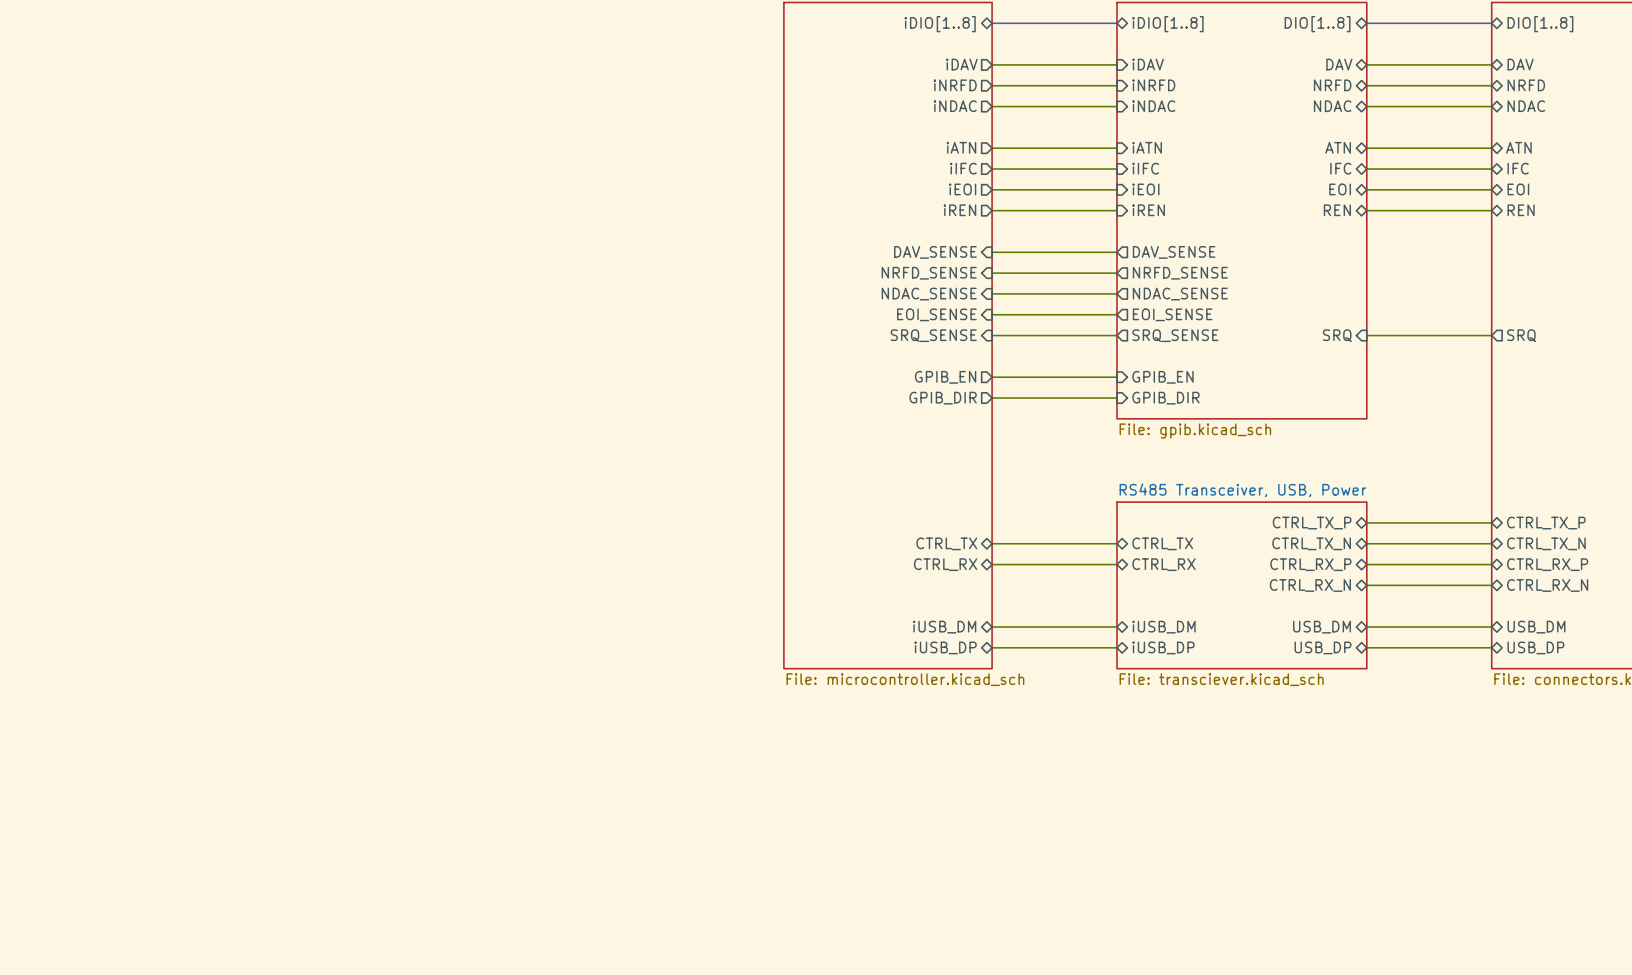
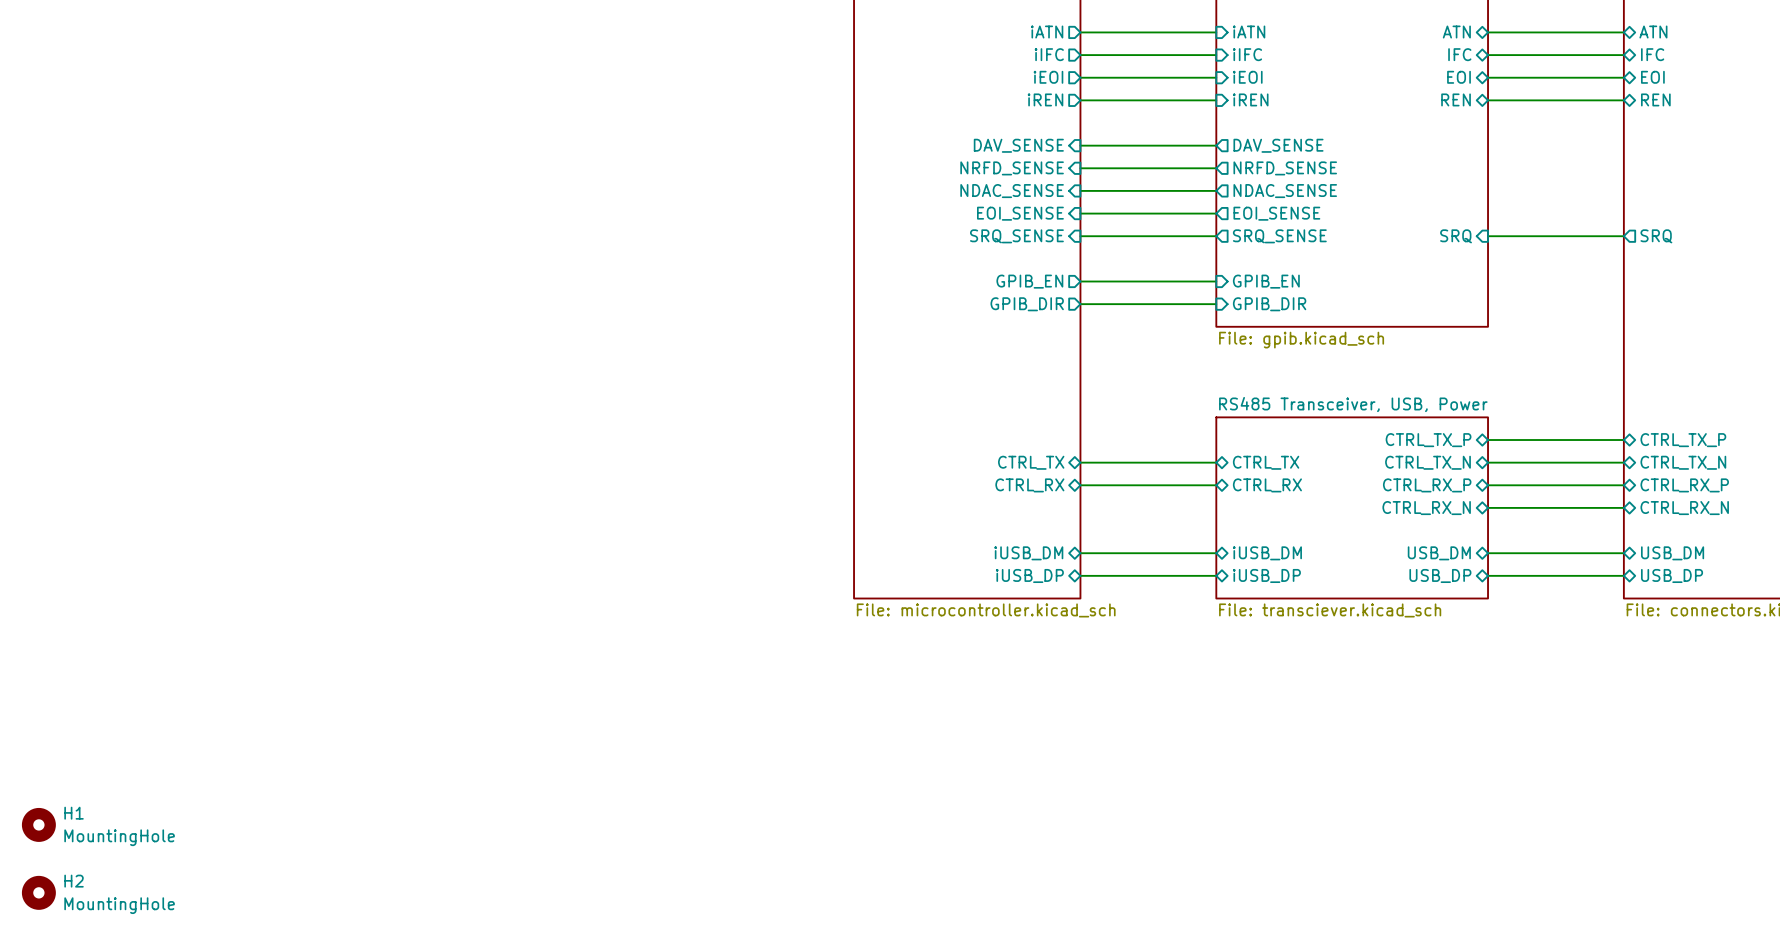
H1: none -> MountingHole (38, 824)
H2: none -> MountingHole (38, 892)

